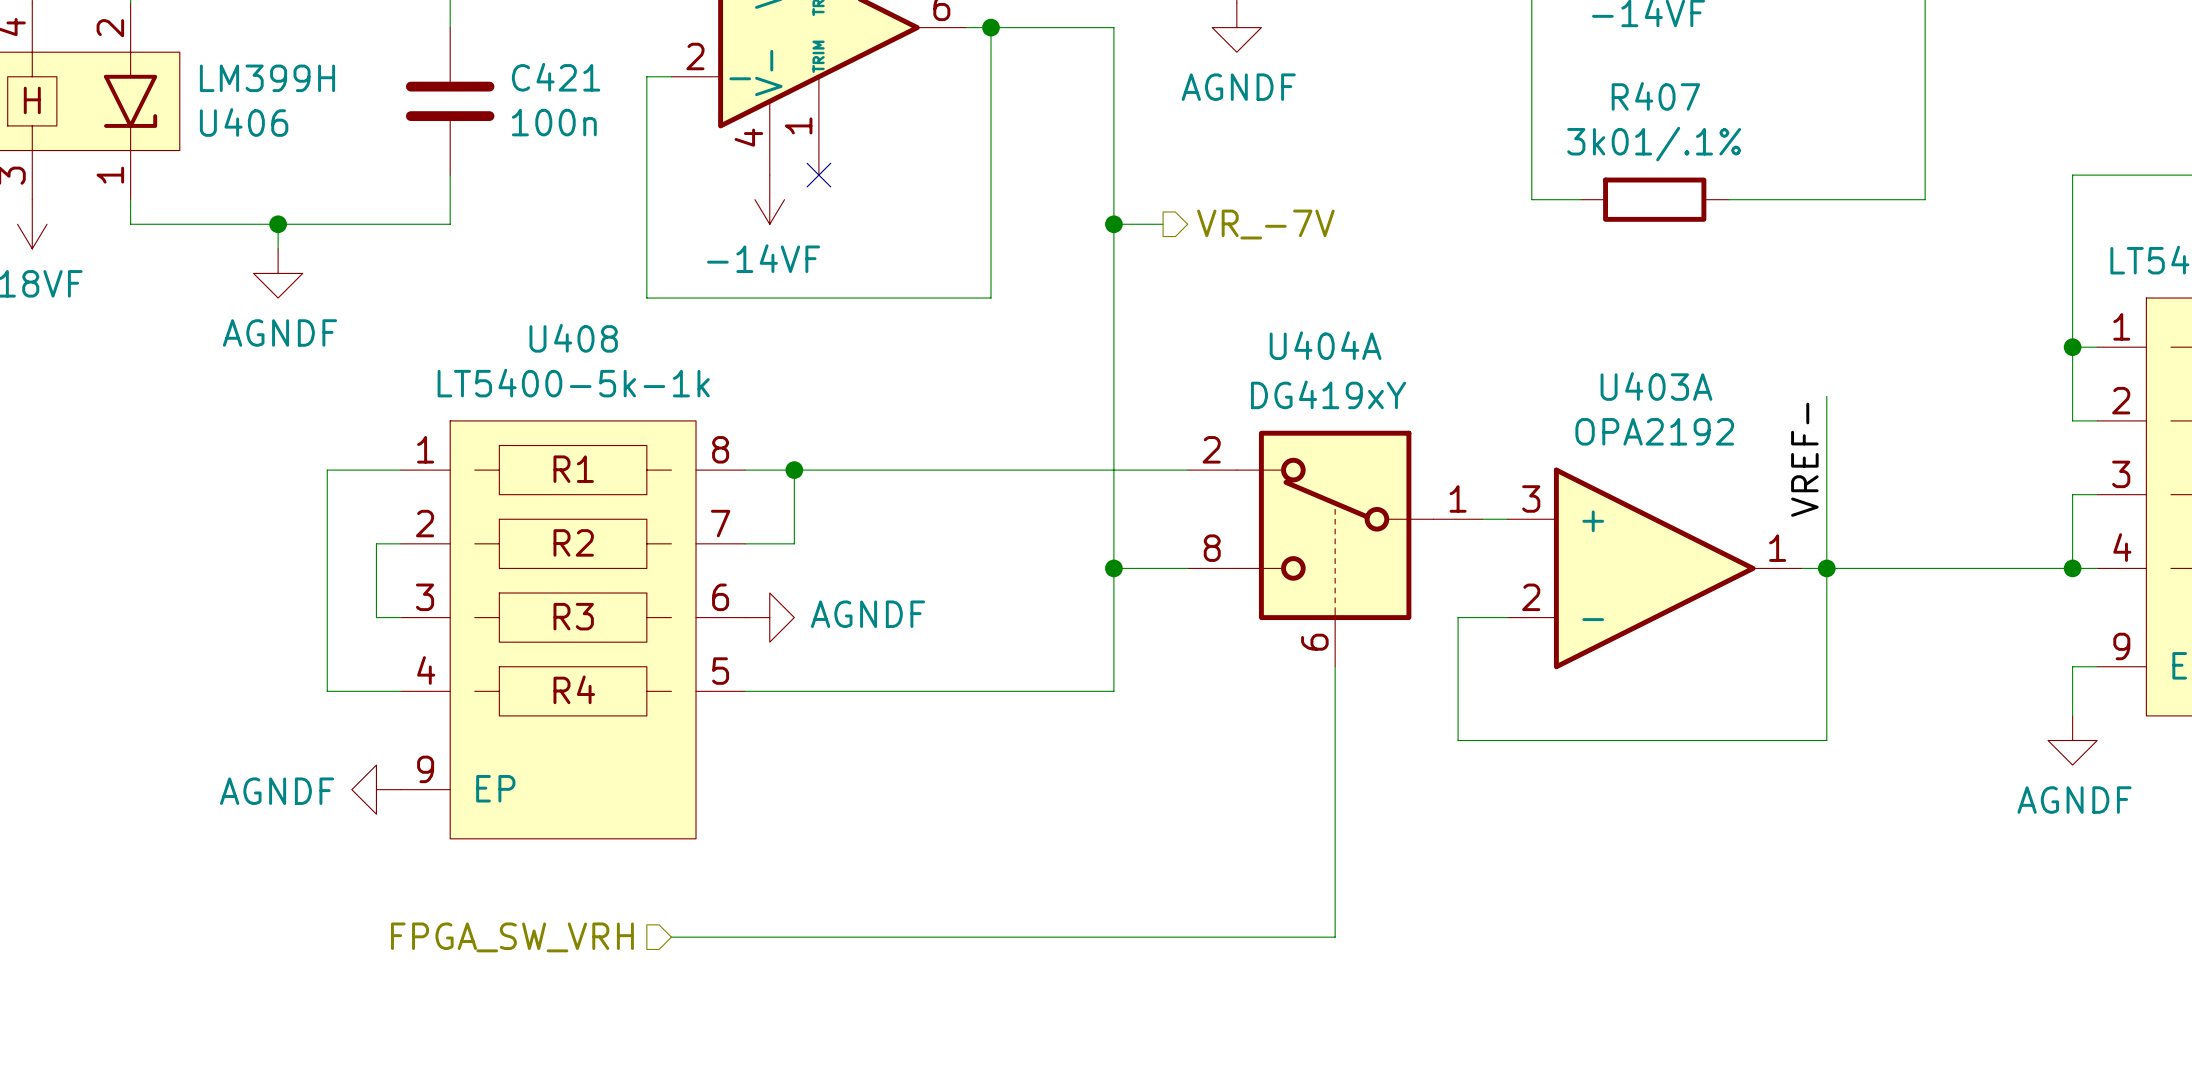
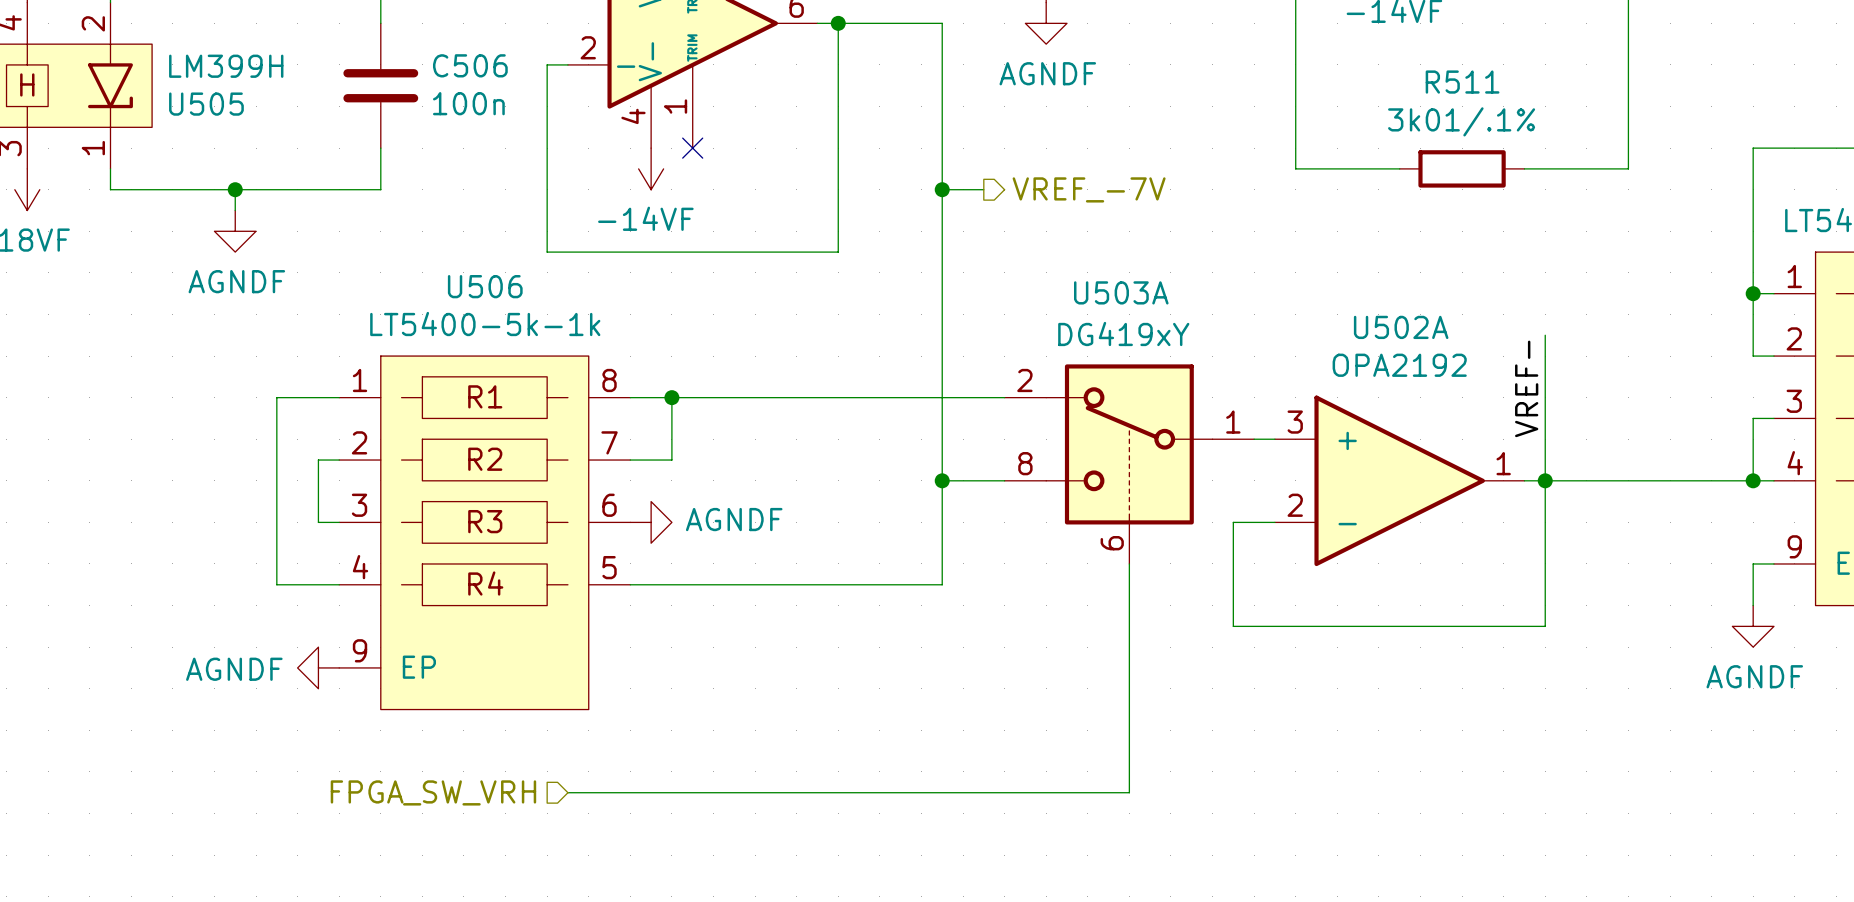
C421 name: C421 (556, 77) -> C506 (470, 65)
U406 name: U406 (244, 122) -> U505 (206, 104)
R407: 3k01/.1% (1654, 199) -> none
wire: (1728, 199) (1802, 199) -> (1337, 168) (1399, 168)
R511: none -> 3k01/.1% (1462, 168)
hierarchical label: VR_-7V (1265, 224) -> VREF_-7V (1089, 189)
U408 name: U408 (573, 338) -> U506 (485, 286)
U404A name: U404A (1325, 345) -> U503A (1121, 292)
U403A name: U403A (1656, 386) -> U502A (1401, 327)

